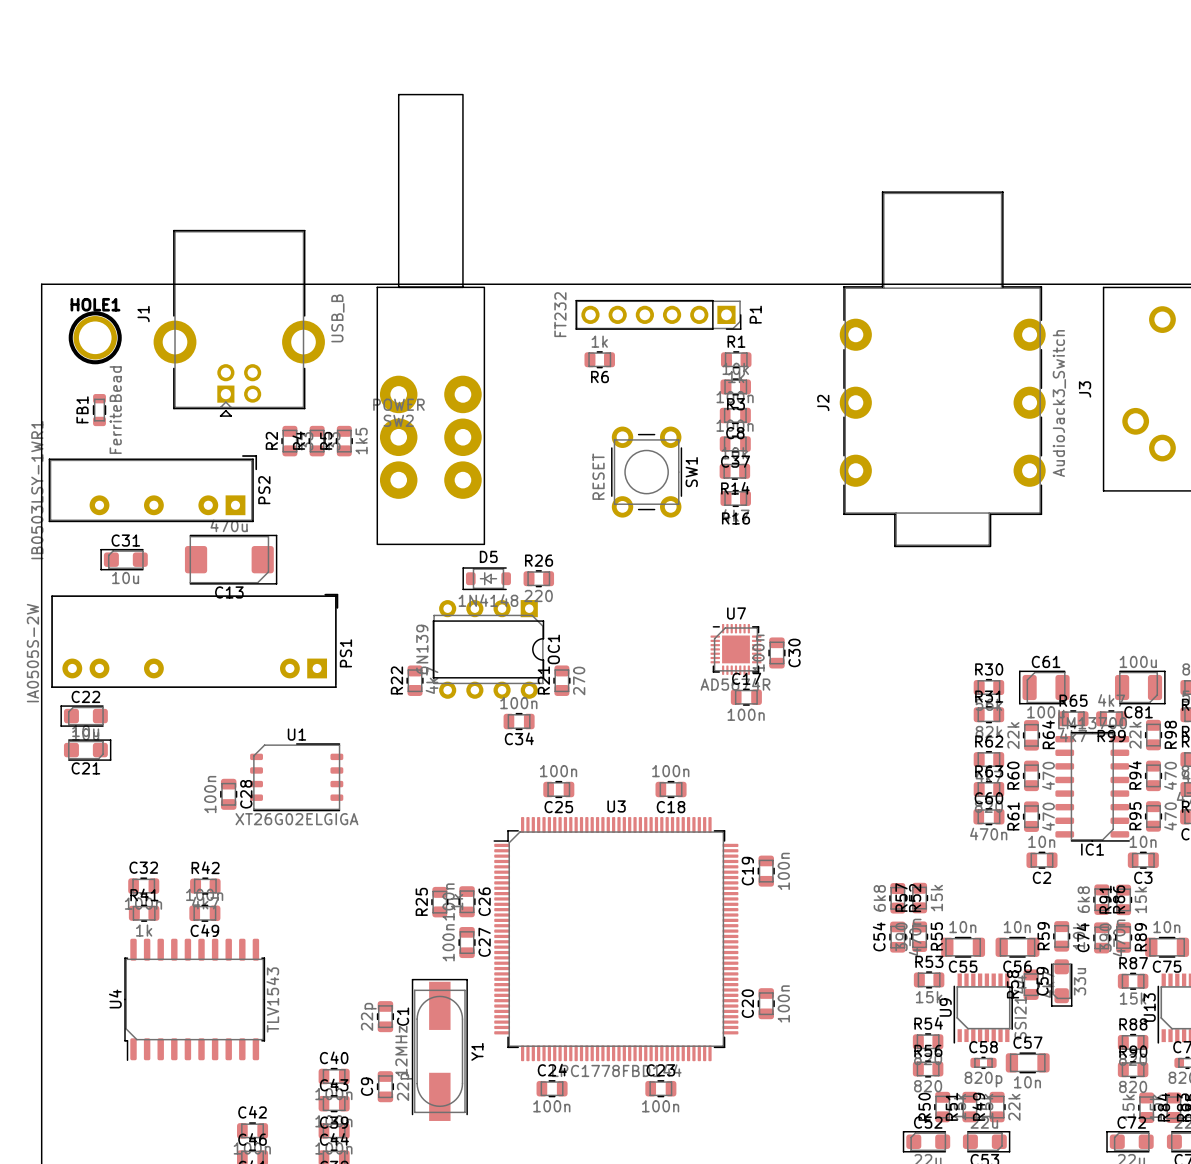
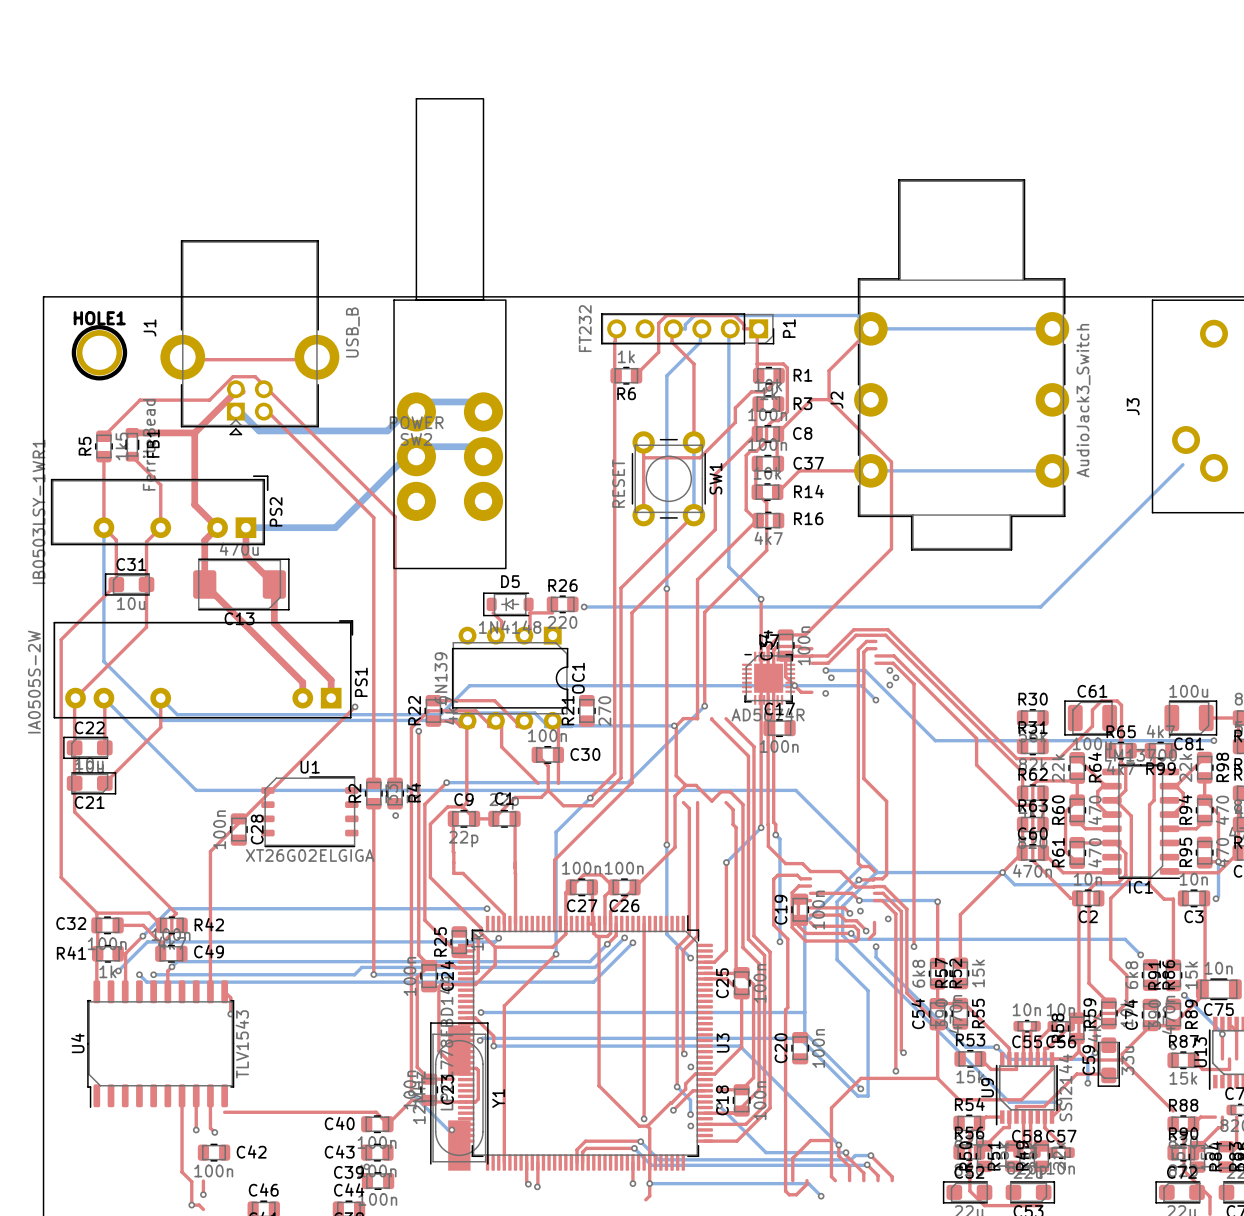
top track: none -> (615, 328) (614, 773) (590, 797)
top track: none -> (672, 328) (672, 342) (693, 364) (693, 442)
bottom track: none -> (672, 328) (685, 328) (685, 324) (694, 315) (857, 315) (870, 328) (1052, 328)
bottom track: none -> (700, 328) (700, 342) (666, 375) (666, 588)
bottom track: none -> (728, 328) (728, 566) (761, 599)
top track: none -> (870, 328) (829, 370) (829, 399)
R1 name position: R1 (736, 341) -> R1 (802, 375)
top track: none -> (189, 359) (323, 359)
top track: none -> (757, 364) (783, 364) (787, 367) (787, 411) (778, 420) (772, 420) (766, 427) (766, 441) (756, 451) (750, 451) (746, 455) (746, 510) (756, 520) (697, 579) (697, 718) (683, 718) (676, 725)
top track: none -> (635, 375) (658, 352) (658, 323) (666, 315) (734, 315) (743, 324) (743, 328) (757, 328) (757, 375)
top track: none -> (777, 375) (777, 379) (764, 391) (751, 391) (735, 408) (735, 422) (699, 457) (643, 457)
J2 position: (942, 369) -> (961, 364)
top track: none -> (242, 391) (235, 391) (194, 432)
top track: none -> (829, 399) (811, 399) (777, 433) (777, 463)
top track: none -> (829, 399) (891, 462) (891, 548) (805, 634) (780, 634) (768, 647) (768, 846) (785, 863) (802, 863) (810, 871) (840, 871) (855, 887) (884, 886) (906, 909) (906, 993) (937, 1023) (937, 1078)
bottom track: none -> (483, 401) (416, 401) (387, 430) (259, 430) (242, 414)
top track: none -> (756, 404) (755, 433) (715, 474) (715, 529) (632, 612) (632, 782) (554, 860) (554, 924)
top track: none -> (270, 414) (373, 517) (373, 783)
R3 name position: R3 (735, 404) -> R3 (802, 403)
FB1 name position: FB1 (82, 409) -> FB1 (153, 443)
FB1 position: (99, 410) -> (132, 444)
top track: none -> (132, 432) (194, 432)
top track: none -> (194, 432) (194, 504) (217, 527) (204, 540) (204, 584) (302, 682) (302, 698)
top track: none -> (103, 436) (140, 400) (209, 400) (233, 376) (255, 376) (395, 516) (395, 783)
top track: none -> (643, 442) (643, 515)
bottom track: none -> (693, 442) (693, 515)
bottom track: none -> (483, 446) (416, 446) (335, 527) (245, 527)
C8 name position: C8 (735, 433) -> C8 (802, 433)
top track: none -> (103, 456) (103, 527) (116, 540) (116, 584) (61, 639) (61, 877) (96, 913)
top track: none -> (132, 456) (160, 485) (160, 527) (146, 541) (146, 627) (74, 699) (74, 811) (176, 913) (171, 917) (171, 933) (161, 943)
R4 name position: R4 (298, 440) -> R4 (414, 792)
R2 position: (289, 441) -> (373, 793)
R4 position: (317, 441) -> (395, 793)
R5 position: (344, 441) -> (103, 446)
top track: none -> (755, 463) (755, 492) (766, 503) (766, 550) (704, 612) (704, 706)
bottom track: none -> (1182, 464) (1040, 606) (584, 606)
top track: none -> (870, 470) (799, 470) (776, 492)
bottom track: none -> (870, 470) (1052, 470)
C37 name position: C37 (735, 461) -> C37 (808, 463)
SW1 position: (646, 472) -> (668, 478)
R14 name position: R14 (735, 488) -> R14 (808, 491)
top track: none -> (693, 515) (621, 588) (621, 777) (593, 805) (563, 805) (548, 790)
bottom track: none -> (103, 527) (103, 661) (162, 720) (461, 720) (468, 713) (534, 713) (545, 723) (545, 726) (674, 725)
top track: none -> (245, 527) (245, 556) (274, 584) (274, 623) (331, 680) (331, 698)
R16 name position: R16 (735, 518) -> R16 (808, 518)
top track: none -> (666, 588) (666, 844)
via: none -> (666, 588)
top track: none -> (761, 599) (761, 827)
via: none -> (761, 599)
via: none -> (584, 606)
top track: none -> (493, 612) (501, 621) (501, 641)
top track: none -> (552, 612) (530, 612) (530, 641)
top track: none -> (875, 641) (866, 641) (858, 649) (858, 863) (861, 866) (869, 866) (874, 871)
top track: none -> (811, 648) (777, 646) (773, 650) (773, 822) (775, 824) (775, 834)
top track: none -> (875, 648) (867, 648) (863, 652) (863, 778) (886, 801) (886, 874) (882, 878) (858, 879)
top track: none -> (875, 655) (894, 655) (976, 738) (976, 765) (1016, 805) (1032, 805)
top track: none -> (811, 663) (828, 663) (856, 635) (885, 635) (1022, 772) (1022, 793)
top track: none -> (875, 663) (893, 663) (914, 684) (914, 946)
bottom track: none -> (825, 670) (865, 670) (935, 740) (1213, 740)
via: none -> (825, 670)
via: none -> (889, 670)
via: none -> (831, 677)
via: none -> (895, 677)
C30 rotation: 0° (776, 652) -> 90° clockwise (547, 754)
C30 position: (776, 652) -> (547, 754)
via: none -> (889, 685)
via: none -> (794, 685)
top track: none -> (811, 692) (801, 692) (785, 676) (785, 656) (827, 655) (853, 629) (888, 629) (1016, 758) (1058, 758) (1092, 726) (1092, 710) (1101, 700) (1117, 700) (1121, 705) (1120, 762) (1125, 767) (1125, 790) (1115, 800)
via: none -> (825, 693)
top track: none -> (103, 698) (104, 747)
bottom track: none -> (103, 698) (196, 790) (795, 790) (876, 872)
top track: none -> (160, 698) (160, 727) (104, 783)
bottom track: none -> (160, 698) (177, 714) (440, 714) (469, 685) (861, 685) (875, 700)
top track: none -> (436, 700) (494, 700) (517, 723) (517, 726) (530, 726)
via: none -> (875, 700)
top track: none -> (355, 706) (210, 851) (210, 991)
via: none -> (355, 706)
bottom track: none -> (704, 706) (628, 782) (446, 782)
via: none -> (704, 706)
top track: none -> (1206, 718) (1238, 718) (1238, 746)
top track: none -> (711, 718) (748, 756) (748, 939) (764, 955) (764, 1105) (745, 1124) (704, 1124)
top track: none -> (726, 718) (753, 746) (753, 935) (770, 952) (770, 1107) (736, 1141) (704, 1141)
top track: none -> (436, 721) (455, 721) (460, 726) (473, 726)
top track: none -> (466, 726) (466, 802) (462, 806)
top track: none -> (558, 726) (558, 783)
via: none -> (674, 725)
top track: none -> (676, 725) (676, 775) (685, 785)
top track: none -> (418, 731) (418, 955) (429, 965)
via: none -> (418, 731)
via: none -> (1213, 740)
top track: none -> (1131, 750) (1150, 750) (1154, 754) (1154, 800) (1149, 804) (1149, 884) (1164, 899) (1173, 899) (1173, 965)
C34 rotation: 0° (519, 721) -> 90° clockwise (785, 645)
C34 position: (519, 721) -> (785, 645)
top track: none -> (537, 754) (548, 765) (548, 790)
top track: none -> (1077, 757) (1103, 783) (1103, 786)
top track: none -> (1204, 757) (1175, 786)
top track: none -> (1204, 777) (1204, 800) (1218, 813) (1218, 861) (1204, 862)
top track: none -> (1077, 778) (1077, 800) (1065, 811) (1065, 851) (1077, 863)
top track: none -> (1077, 780) (1037, 780) (1032, 785) (1032, 860) (1070, 898) (1078, 899) (1078, 1051)
top track: none -> (446, 782) (424, 804) (424, 920) (455, 950) (466, 950)
via: none -> (446, 782)
top track: none -> (538, 783) (501, 746) (501, 726) (488, 726) (488, 723) (475, 710) (428, 710) (411, 728) (411, 1093)
top track: none -> (685, 785) (675, 796) (675, 847) (610, 911) (610, 933) (607, 936) (596, 936) (593, 933) (593, 924) (588, 924)
top track: none -> (685, 785) (696, 785) (711, 801) (721, 791) (730, 791) (742, 804) (742, 947) (759, 963) (759, 1089) (735, 1113)
top track: none -> (1103, 786) (1097, 791) (1097, 804) (1107, 814) (1111, 814)
top track: none -> (1175, 786) (1183, 793) (1183, 804) (1173, 814) (1169, 814)
top track: none -> (548, 790) (541, 797) (515, 797) (493, 818) (474, 818) (462, 806)
top track: none -> (1043, 793) (1043, 852) (1063, 872) (1111, 871)
top track: none -> (1238, 793) (1238, 852) (1218, 872) (1169, 871)
bottom track: none -> (590, 797) (556, 832) (556, 954)
via: none -> (590, 797)
top track: none -> (1115, 800) (1131, 815) (1131, 877) (1110, 898) (1110, 959) (1126, 975) (1126, 1002) (1116, 1013) (1101, 1013) (1095, 1019) (1095, 1052)
top track: none -> (683, 802) (689, 808) (689, 935) (677, 947) (677, 1086)
top track: none -> (697, 802) (697, 936) (683, 950) (684, 1053)
top track: none -> (726, 802) (733, 809) (733, 824) (736, 827) (736, 972)
top track: none -> (373, 803) (373, 974)
top track: none -> (462, 806) (447, 806) (430, 824) (430, 877) (480, 928) (480, 932) (495, 947)
via: none -> (395, 815)
top track: none -> (453, 818) (453, 873) (463, 873) (504, 914) (504, 924)
top track: none -> (515, 818) (515, 868)
top track: none -> (1077, 820) (1085, 828) (1111, 828)
top track: none -> (1204, 820) (1196, 828) (1169, 828)
C25 rotation: 0° (558, 789) -> 90° clockwise (741, 983)
C25 position: (558, 789) -> (741, 983)
C18 rotation: 0° (671, 789) -> 90° clockwise (741, 1100)
C18 position: (671, 789) -> (741, 1100)
top track: none -> (1022, 824) (1022, 852) (960, 914) (960, 963)
bottom track: none -> (761, 827) (726, 862)
via: none -> (761, 827)
bottom track: none -> (775, 834) (779, 839) (779, 941)
via: none -> (775, 834)
top track: none -> (1077, 842) (1115, 842) (1125, 853) (1125, 875) (1118, 882) (1096, 882) (1089, 890) (1089, 983) (1108, 1003)
bottom track: none -> (666, 844) (666, 934) (690, 958)
via: none -> (666, 844)
top track: none -> (726, 862) (726, 950) (714, 962) (704, 962)
via: none -> (726, 862)
bottom track: none -> (1218, 861) (1218, 896) (1215, 898)
via: none -> (1218, 861)
top track: none -> (515, 862) (515, 924)
bottom track: none -> (861, 866) (804, 923) (804, 1032) (860, 1088)
bottom track: none -> (876, 872) (842, 906) (842, 935) (1009, 1102) (1059, 1102)
bottom track: none -> (876, 872) (1002, 872) (1014, 884) (1149, 884)
via: none -> (1002, 872)
top track: none -> (810, 878) (800, 878) (797, 875) (777, 875) (773, 879) (773, 925) (787, 939) (787, 1007) (785, 1009) (785, 1191) (789, 1194) (796, 1194) (806, 1184) (806, 1180)
bottom track: none -> (858, 879) (837, 901) (837, 959) (868, 990) (868, 1096) (857, 1096) (800, 1038) (482, 1038) (480, 1040)
via: none -> (858, 879)
top track: none -> (810, 886) (798, 886) (792, 892) (792, 927) (805, 941) (856, 941) (858, 938) (858, 930) (854, 926) (814, 926) (810, 922)
top track: none -> (592, 887) (592, 924)
top track: none -> (810, 893) (852, 893) (859, 900)
top track: none -> (874, 893) (883, 893) (901, 911) (901, 1050) (903, 1052)
top track: none -> (1204, 898) (1205, 993) (1172, 1025) (1150, 1025) (1122, 1054) (1122, 1060)
via: none -> (1215, 898)
top track: none -> (810, 900) (802, 900) (798, 904) (798, 925) (806, 933) (851, 933)
bottom track: none -> (859, 900) (937, 901)
via: none -> (859, 900)
top track: none -> (874, 900) (882, 900) (895, 913) (895, 1071)
top track: none -> (937, 901) (937, 963)
via: none -> (937, 901)
C32 name position: C32 (143, 867) -> C32 (71, 923)
R42 name position: R42 (205, 867) -> R42 (209, 924)
top track: none -> (810, 907) (844, 907) (849, 913)
bottom track: none -> (487, 908) (170, 908) (142, 936)
via: none -> (487, 908)
via: none -> (860, 911)
top track: none -> (96, 913) (149, 913) (161, 925)
top track: none -> (96, 913) (96, 991)
via: none -> (849, 913)
top track: none -> (810, 915) (840, 915) (845, 920) (856, 920) (866, 931)
via: none -> (888, 918)
top track: none -> (874, 922) (874, 933) (869, 938)
top track: none -> (604, 924) (604, 896) (613, 887) (601, 874) (583, 874) (565, 892) (565, 933) (552, 947) (495, 947)
top track: none -> (616, 924) (616, 935) (607, 944)
top track: none -> (644, 924) (644, 1118)
top track: none -> (118, 925) (143, 925) (161, 943)
C32 position: (143, 886) -> (107, 925)
R42 position: (205, 886) -> (171, 925)
via: none -> (866, 931)
bottom track: none -> (851, 933) (857, 939) (1125, 939) (1140, 954)
via: none -> (851, 933)
R41 name position: R41 (144, 894) -> R41 (71, 953)
top track: none -> (473, 934) (478, 939) (478, 971) (476, 973) (466, 973)
top track: none -> (142, 936) (125, 953)
via: none -> (142, 936)
top track: none -> (599, 936) (599, 1085) (639, 1126) (647, 1126)
bottom track: none -> (498, 938) (495, 941) (147, 941) (118, 970)
via: none -> (498, 938)
bottom track: none -> (624, 937) (595, 967) (361, 967) (354, 974) (153, 974)
via: none -> (624, 937)
R52 position: (897, 898) -> (937, 973)
R57 position: (919, 898) -> (960, 973)
R86 position: (1101, 899) -> (1150, 975)
R91 position: (1123, 899) -> (1173, 975)
C26 rotation: 0° (467, 901) -> 90° clockwise (624, 887)
C26 position: (467, 901) -> (624, 887)
via: none -> (779, 941)
bottom track: none -> (632, 942) (593, 982) (146, 982) (139, 974)
via: none -> (632, 942)
bottom track: none -> (607, 944) (589, 961) (177, 961) (171, 966)
via: none -> (607, 944)
top track: none -> (495, 947) (495, 964) (475, 984) (441, 984) (438, 986) (438, 1051) (456, 1068) (476, 1068) (478, 1070) (478, 1099) (475, 1101) (411, 1100) (387, 1124) (376, 1112) (224, 1112)
bottom track: none -> (876, 946) (876, 957) (965, 1047) (996, 1047) (1008, 1059) (1088, 1059) (1095, 1052)
via: none -> (876, 946)
via: none -> (914, 946)
top track: none -> (125, 953) (125, 991)
R41 position: (144, 913) -> (107, 953)
C49 position: (204, 913) -> (171, 953)
top track: none -> (556, 954) (504, 1005) (504, 1162)
via: none -> (556, 954)
via: none -> (1140, 954)
via: none -> (690, 958)
top track: none -> (429, 965) (466, 967)
top track: none -> (429, 965) (417, 977) (417, 1067) (429, 1079) (453, 1079)
top track: none -> (171, 966) (167, 971) (167, 991)
via: none -> (171, 966)
via: none -> (118, 970)
C49 name position: C49 (204, 930) -> C49 (209, 951)
top track: none -> (736, 972) (741, 972) (753, 984) (753, 1077) (741, 1089) (717, 1089)
top track: none -> (736, 972) (704, 973)
via: none -> (139, 974)
via: none -> (153, 974)
bottom track: none -> (373, 974) (451, 974)
via: none -> (373, 974)
R55 position: (919, 936) -> (960, 1013)
C55 footprint: [941, 936, 986, 958] -> [1013, 1019, 1041, 1033]
C56 footprint: [995, 936, 1040, 958] -> [1047, 1019, 1075, 1033]
R59 position: (1061, 936) -> (1108, 1013)
top track: none -> (704, 978) (726, 978) (741, 993) (741, 1047) (714, 1074) (695, 1074) (685, 1083) (685, 1089) (647, 1126)
C54 position: (897, 937) -> (937, 1014)
C74 position: (1101, 937) -> (1150, 1015)
R89 position: (1123, 937) -> (1173, 1014)
U3 rotation: 0° (615, 939) -> 90° clockwise (585, 1042)
C27 rotation: 0° (467, 942) -> 90° clockwise (581, 887)
C27 position: (467, 942) -> (581, 887)
top track: none -> (937, 983) (937, 1003) (964, 1003) (1009, 1048) (1009, 1058)
top track: none -> (224, 991) (230, 997) (230, 1014)
bottom track: none -> (1184, 995) (1222, 1034)
via: none -> (1184, 995)
bottom track: none -> (481, 1012) (804, 1012)
via: none -> (481, 1012)
via: none -> (230, 1014)
top track: none -> (466, 1018) (475, 1018) (493, 1036) (493, 1046)
R53 position: (929, 979) -> (970, 1058)
R87 position: (1133, 981) -> (1183, 1060)
top track: none -> (1018, 1026) (1023, 1031) (1023, 1058)
top track: none -> (1035, 1026) (1030, 1031) (1030, 1058)
top track: none -> (1052, 1026) (1037, 1040) (1037, 1058)
top track: none -> (1069, 1026) (1047, 1048) (1044, 1048) (1044, 1058)
C59 position: (1061, 982) -> (1108, 1062)
top track: none -> (1231, 1026) (1236, 1031) (1236, 1058)
top track: none -> (1222, 1034) (1222, 1058)
via: none -> (1222, 1034)
via: none -> (480, 1040)
U4 position: (194, 999) -> (160, 1044)
bottom track: none -> (493, 1046) (739, 1046) (838, 1145)
via: none -> (493, 1046)
via: none -> (996, 1047)
via: none -> (1173, 1046)
top track: none -> (1078, 1051) (1071, 1058) (1051, 1058) (1051, 1069) (1021, 1099) (959, 1099) (937, 1078)
top track: none -> (1078, 1051) (1087, 1060) (1122, 1060)
via: none -> (903, 1052)
U9 position: (983, 1008) -> (1026, 1088)
via: none -> (1095, 1052)
via: none -> (684, 1053)
top track: none -> (980, 1058) (991, 1069) (1016, 1069) (1016, 1058)
top track: none -> (1229, 1058) (1229, 1069) (1202, 1069) (1193, 1060)
bottom track: none -> (1087, 1059) (1087, 1083)
top track: none -> (1122, 1060) (1173, 1110)
C1 rotation: 0° (385, 1016) -> 90° clockwise (504, 818)
C1 position: (385, 1016) -> (504, 818)
C1 name position: C1 (403, 1016) -> C1 (504, 798)
via: none -> (690, 1066)
via: none -> (895, 1071)
top track: none -> (1108, 1075) (1076, 1074) (1044, 1106) (1016, 1106) (1016, 1117)
top track: none -> (937, 1078) (861, 1078) (831, 1108) (831, 1176) (835, 1180)
via: none -> (1087, 1083)
bottom track: none -> (677, 1086) (690, 1100) (690, 1114)
via: none -> (677, 1086)
R54 position: (928, 1041) -> (969, 1123)
via: none -> (860, 1088)
R88 position: (1133, 1042) -> (1183, 1124)
top track: none -> (704, 1090) (692, 1090) (673, 1110)
bottom track: none -> (411, 1093) (448, 1129) (451, 1129)
via: none -> (411, 1093)
top track: none -> (182, 1095) (182, 1172) (191, 1181) (191, 1205) (199, 1205) (203, 1209)
top track: none -> (196, 1095) (196, 1130)
top track: none -> (210, 1095) (210, 1128) (214, 1132)
C57 footprint: [1005, 1052, 1050, 1074] -> [1047, 1146, 1075, 1160]
top track: none -> (1059, 1102) (1059, 1109) (1051, 1117)
via: none -> (1059, 1102)
C40 name position: C40 (334, 1057) -> C40 (339, 1123)
bottom track: none -> (719, 1105) (766, 1152) (846, 1152)
via: none -> (719, 1105)
C58 position: (983, 1062) -> (1026, 1152)
via: none -> (673, 1110)
top track: none -> (741, 1111) (739, 1113) (704, 1113)
via: none -> (690, 1114)
R56 position: (928, 1068) -> (969, 1151)
top track: none -> (1002, 1117) (985, 1117) (969, 1133) (969, 1191) (984, 1205) (1041, 1205)
top track: none -> (1009, 1117) (1009, 1127) (1003, 1127) (979, 1151)
top track: none -> (1023, 1117) (1023, 1147) (1018, 1152)
top track: none -> (1030, 1117) (1030, 1147) (1035, 1152)
top track: none -> (1044, 1117) (1044, 1127) (1069, 1152)
R90 position: (1133, 1069) -> (1183, 1152)
top track: none -> (1215, 1117) (1200, 1117) (1183, 1133) (1183, 1170) (1209, 1196) (1209, 1214)
top track: none -> (1222, 1117) (1222, 1127) (1218, 1127) (1193, 1152)
top track: none -> (1236, 1117) (1236, 1147) (1231, 1152)
via: none -> (644, 1118)
C40 position: (334, 1076) -> (377, 1124)
top track: none -> (647, 1126) (649, 1128) (649, 1195) (645, 1199)
via: none -> (690, 1126)
via: none -> (451, 1129)
via: none -> (196, 1130)
via: none -> (214, 1132)
C43 name position: C43 (334, 1085) -> C43 (339, 1151)
C9 rotation: 0° (385, 1086) -> 90° clockwise (463, 818)
C9 position: (385, 1086) -> (463, 818)
C24 rotation: 0° (552, 1088) -> 90° clockwise (429, 976)
C24 position: (552, 1088) -> (429, 976)
C23 rotation: 0° (660, 1088) -> 90° clockwise (429, 1089)
C23 position: (660, 1088) -> (429, 1089)
top track: none -> (831, 1140) (810, 1140) (792, 1158) (792, 1180)
top track: none -> (640, 1141) (585, 1141) (577, 1149) (577, 1162)
bottom track: none -> (640, 1141) (658, 1159) (851, 1159) (855, 1155) (870, 1155)
via: none -> (640, 1141)
top track: none -> (838, 1145) (838, 1156) (849, 1166) (849, 1180)
via: none -> (838, 1145)
top track: none -> (634, 1148) (586, 1148) (582, 1152) (582, 1162)
bottom track: none -> (634, 1148) (651, 1165) (867, 1164)
via: none -> (634, 1148)
C43 position: (334, 1103) -> (377, 1152)
top track: none -> (846, 1152) (846, 1155) (863, 1173) (863, 1180)
via: none -> (846, 1152)
top track: none -> (870, 1155) (892, 1176) (892, 1180)
via: none -> (870, 1155)
C42 name position: C42 (252, 1112) -> C42 (251, 1151)
top track: none -> (526, 1162) (526, 1182) (528, 1184)
top track: none -> (537, 1162) (537, 1186)
top track: none -> (632, 1162) (632, 1183)
top track: none -> (867, 1164) (878, 1175) (878, 1180)
via: none -> (867, 1164)
via: none -> (366, 1166)
top track: none -> (203, 1181) (203, 1194)
C42 position: (252, 1130) -> (214, 1152)
C39 position: (334, 1130) -> (378, 1181)
via: none -> (528, 1184)
via: none -> (632, 1183)
bottom track: none -> (649, 1183) (808, 1183) (821, 1196)
via: none -> (649, 1183)
via: none -> (537, 1186)
via: none -> (203, 1194)
via: none -> (821, 1196)
via: none -> (191, 1205)

